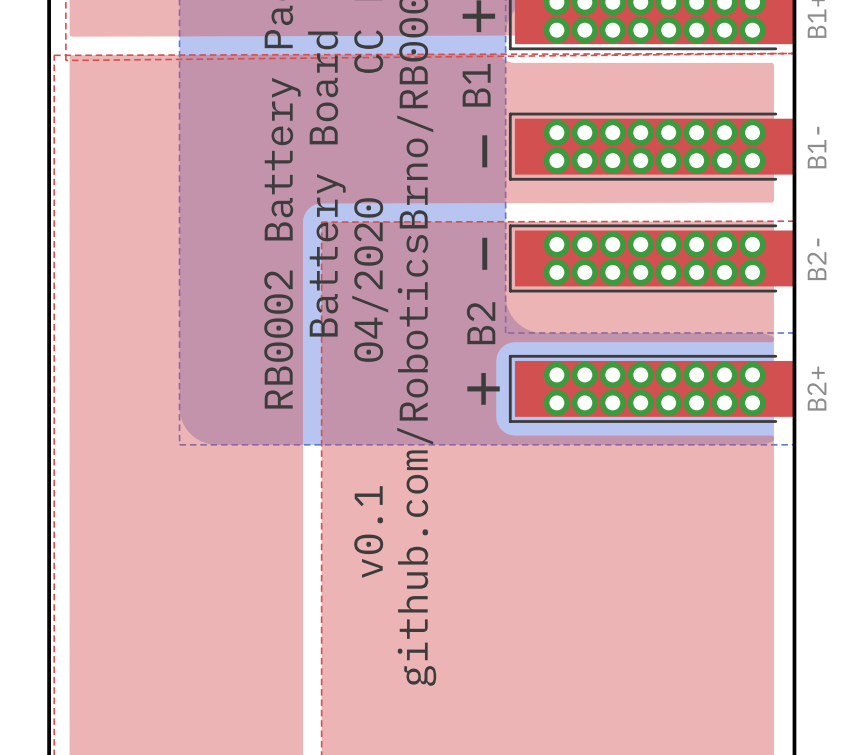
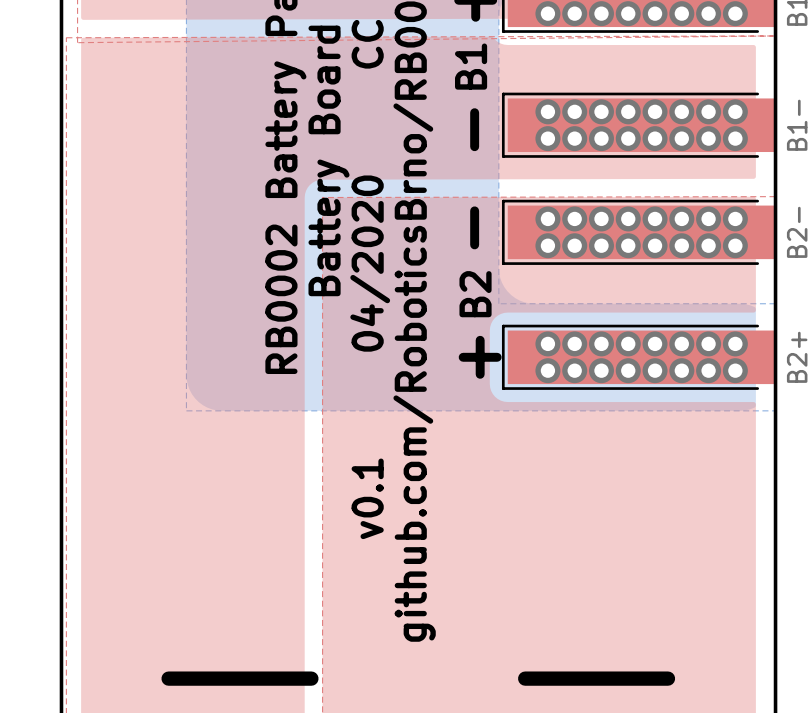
line: none -> (168, 678) (311, 678)
line: none -> (525, 678) (667, 678)

